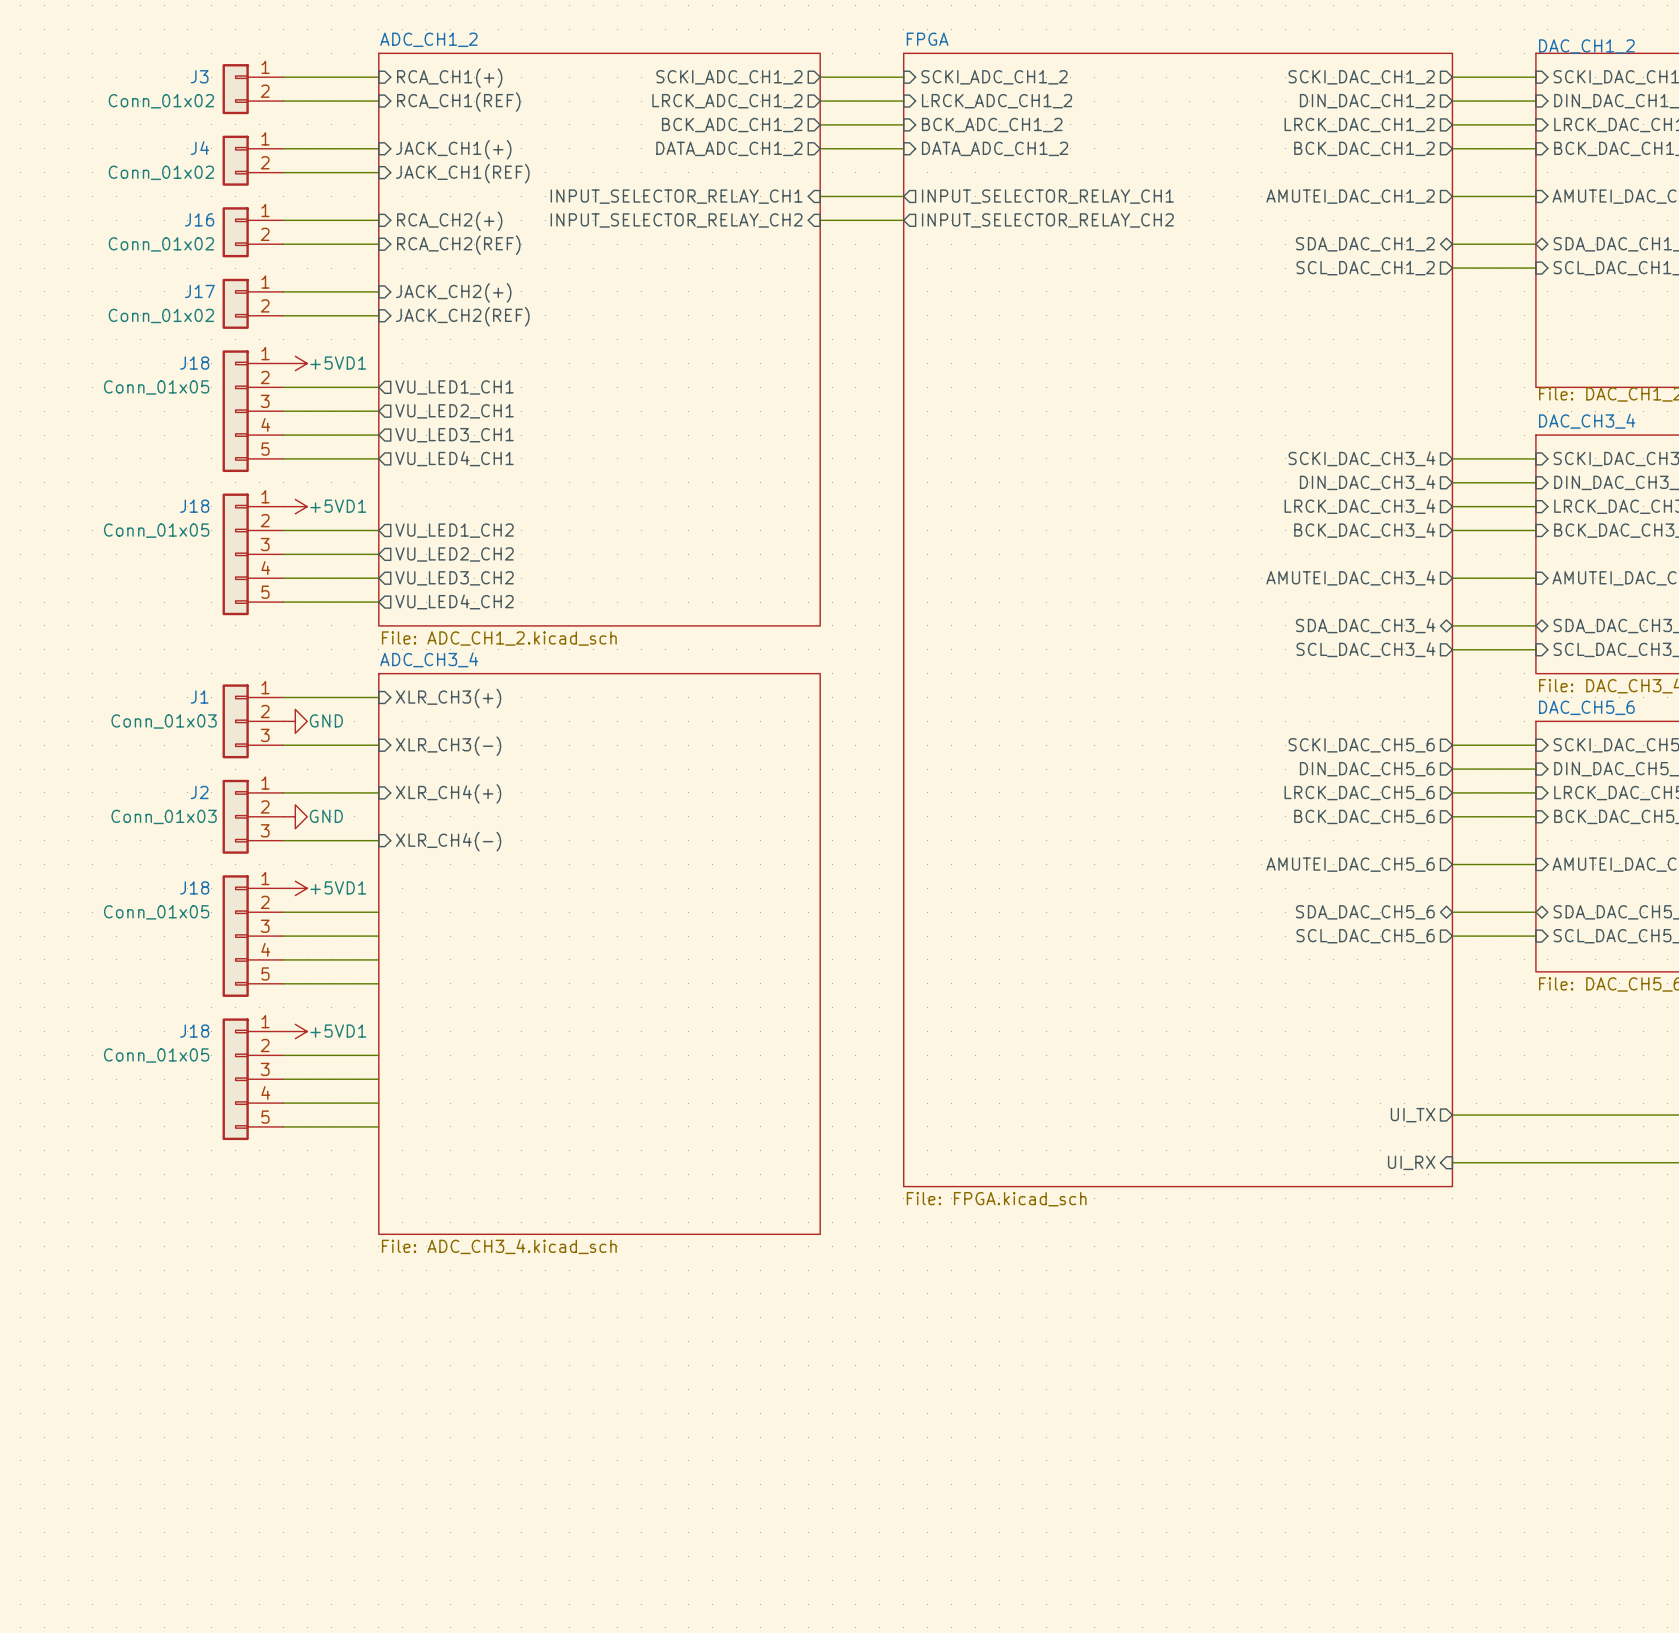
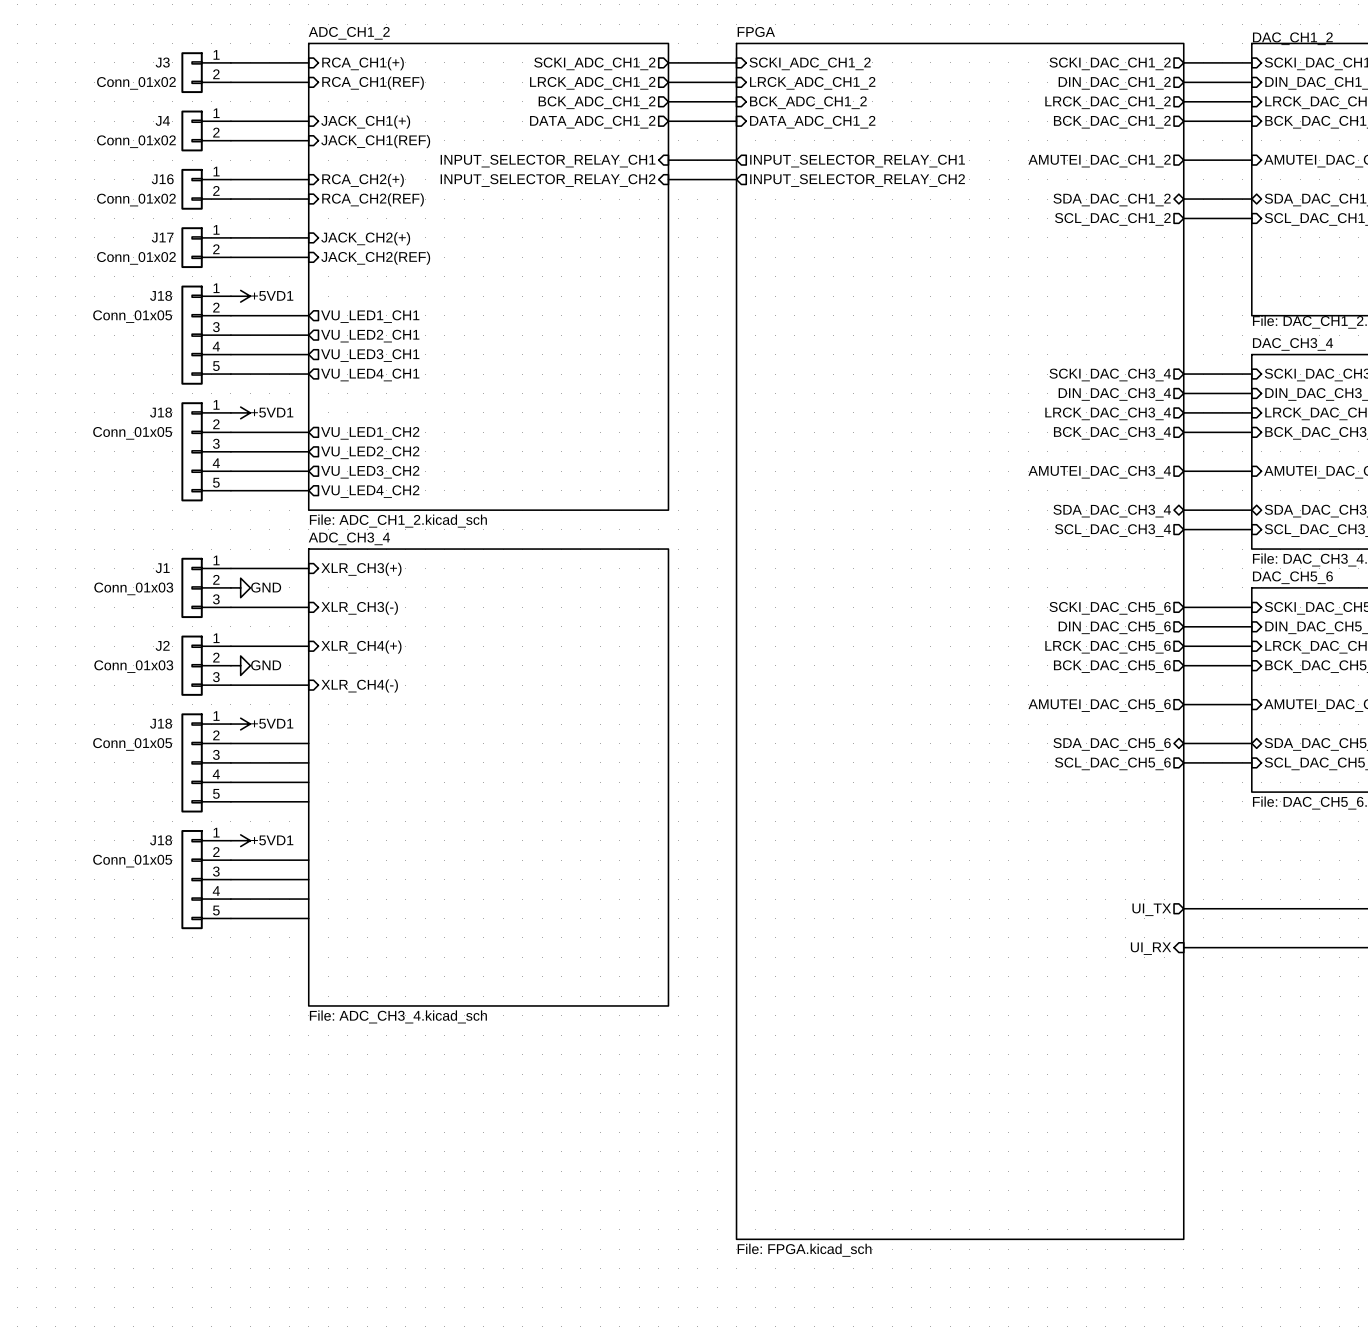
sheet FPGA: File: FPGA.kicad_sch (1178, 619) -> none
sheet FPGA: none -> File: FPGA.kicad_sch (960, 641)

